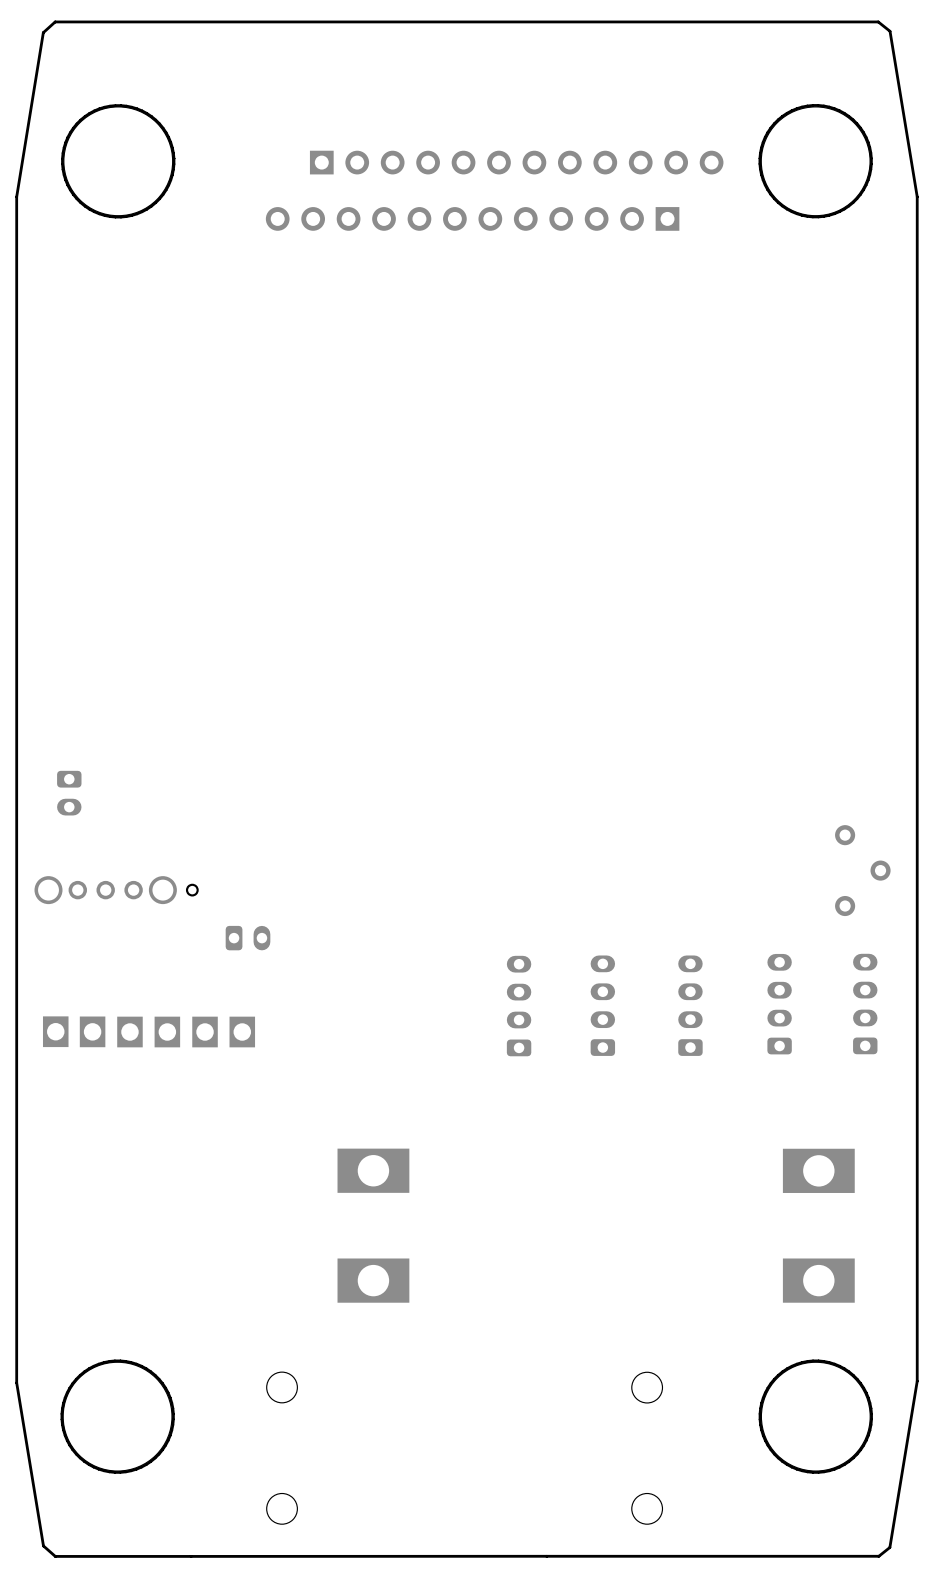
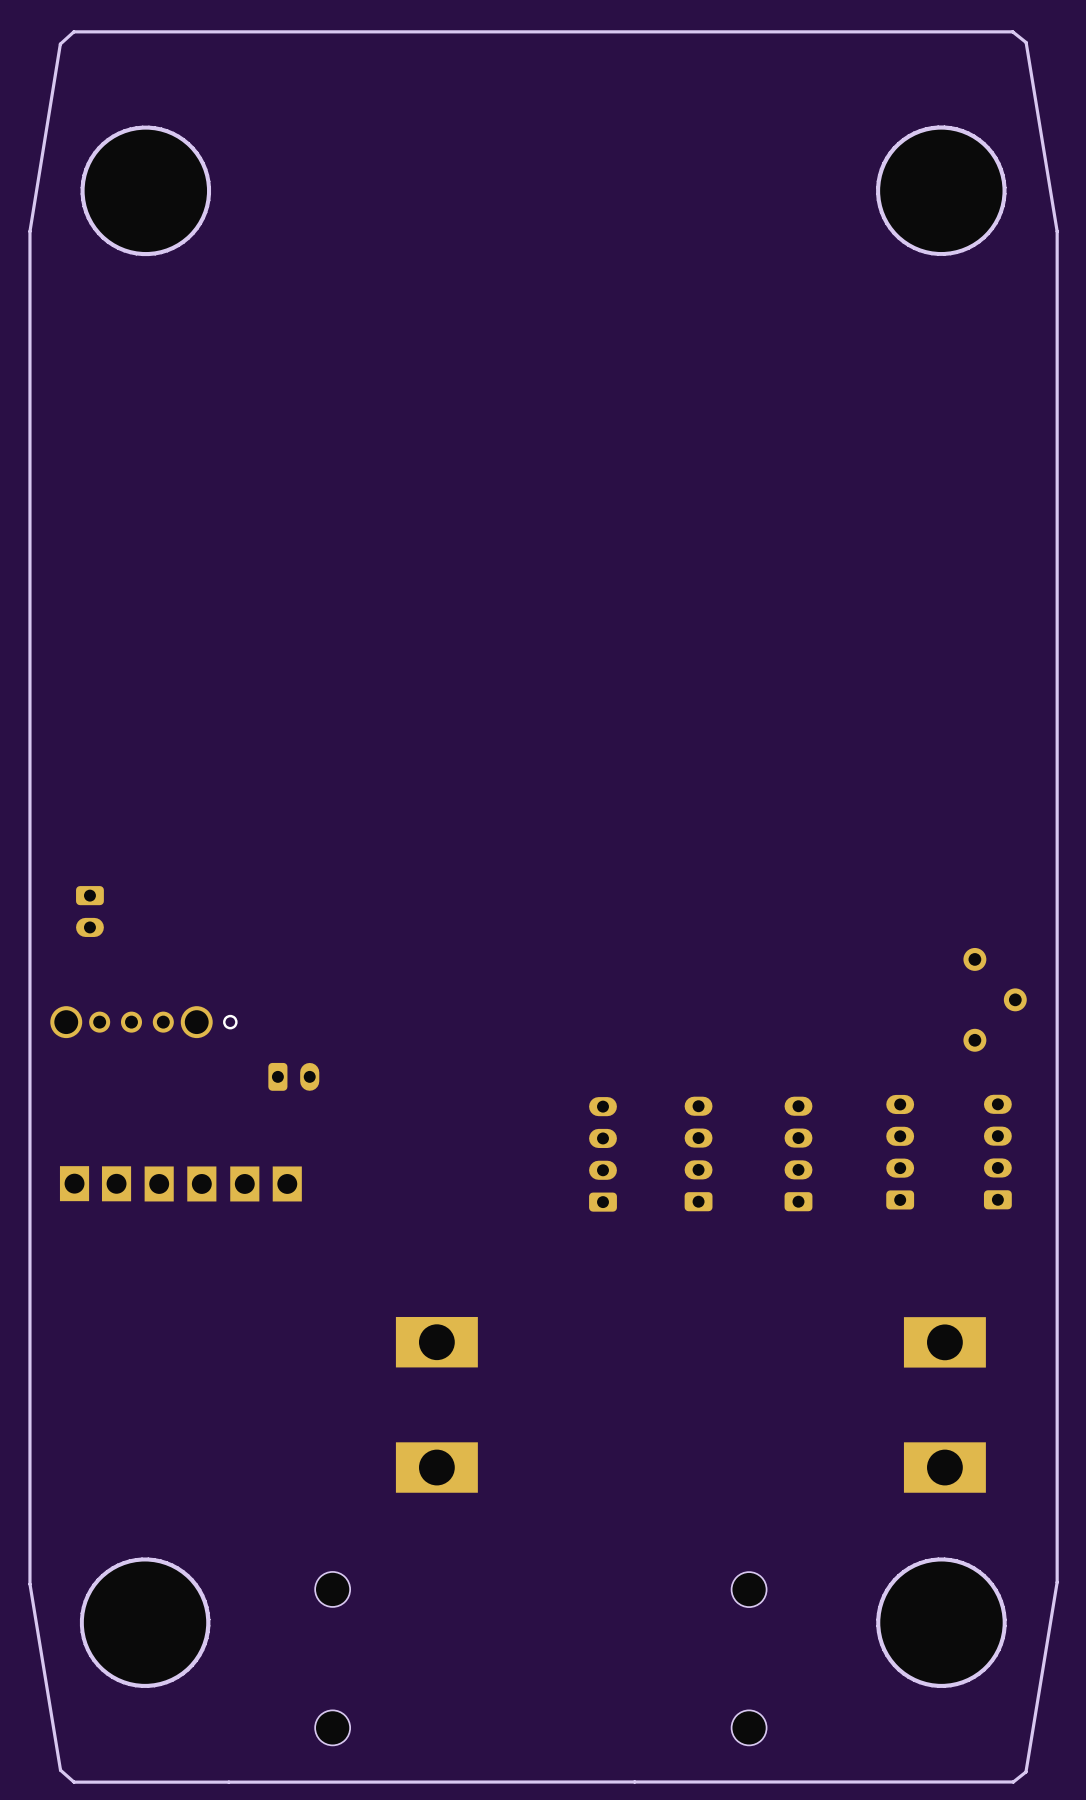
part: (516, 162) -> none
part: (472, 218) -> none

